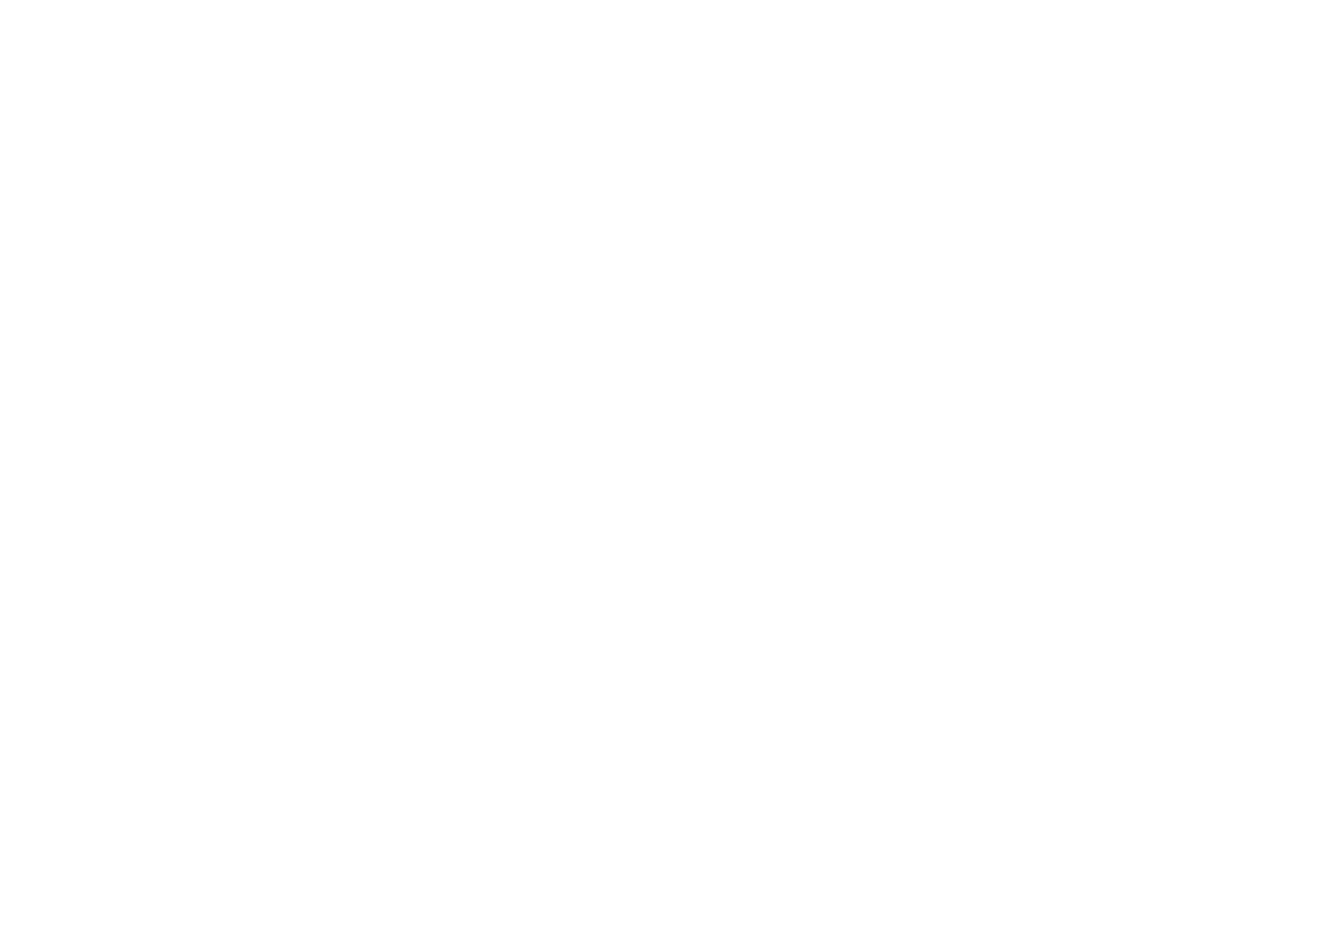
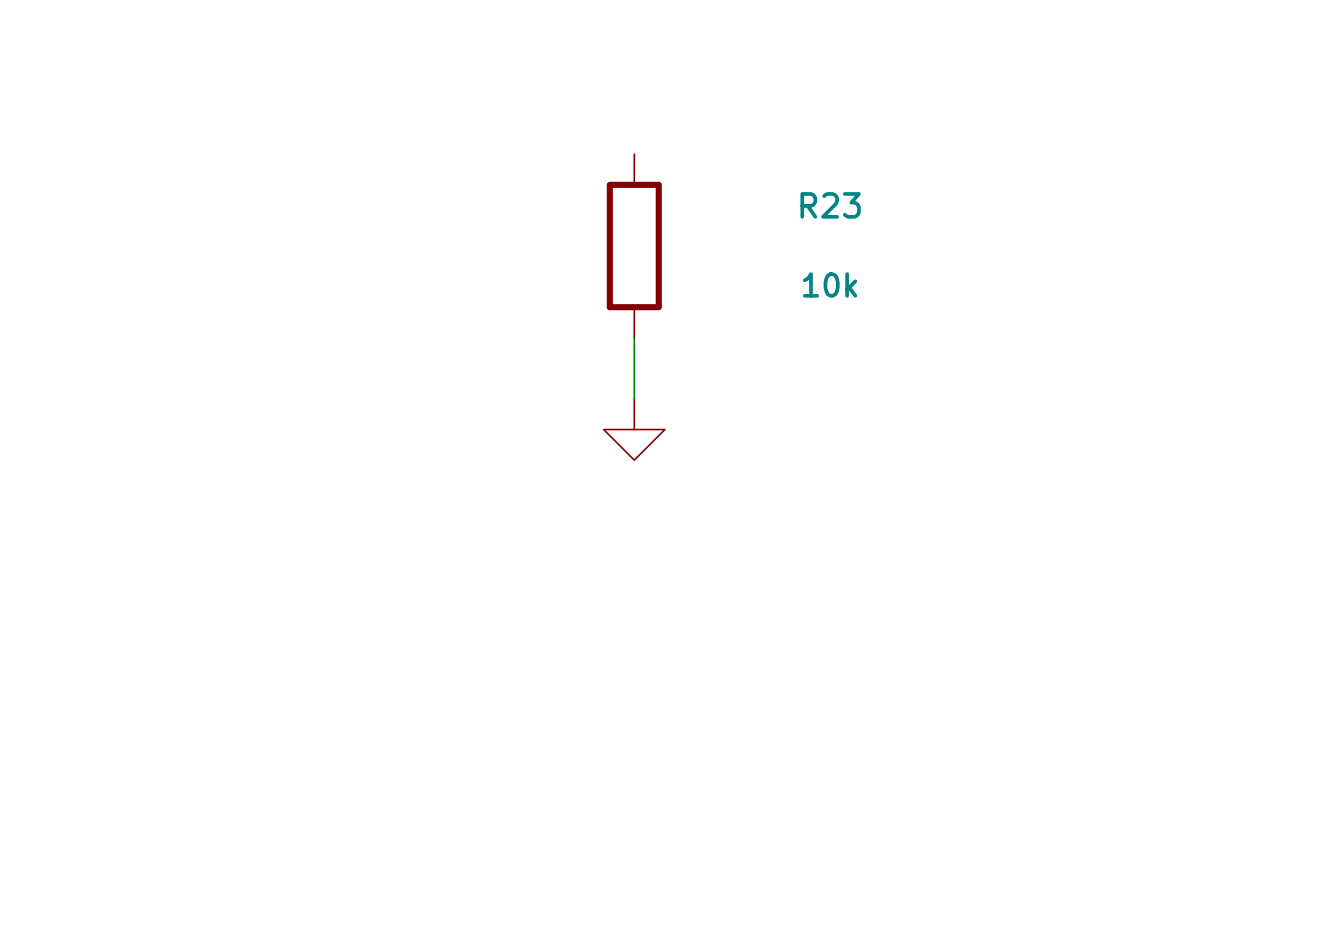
R23: none -> 10k (634, 246)
wire: none -> (634, 337) (634, 398)
power symbol: none -> (634, 429)

